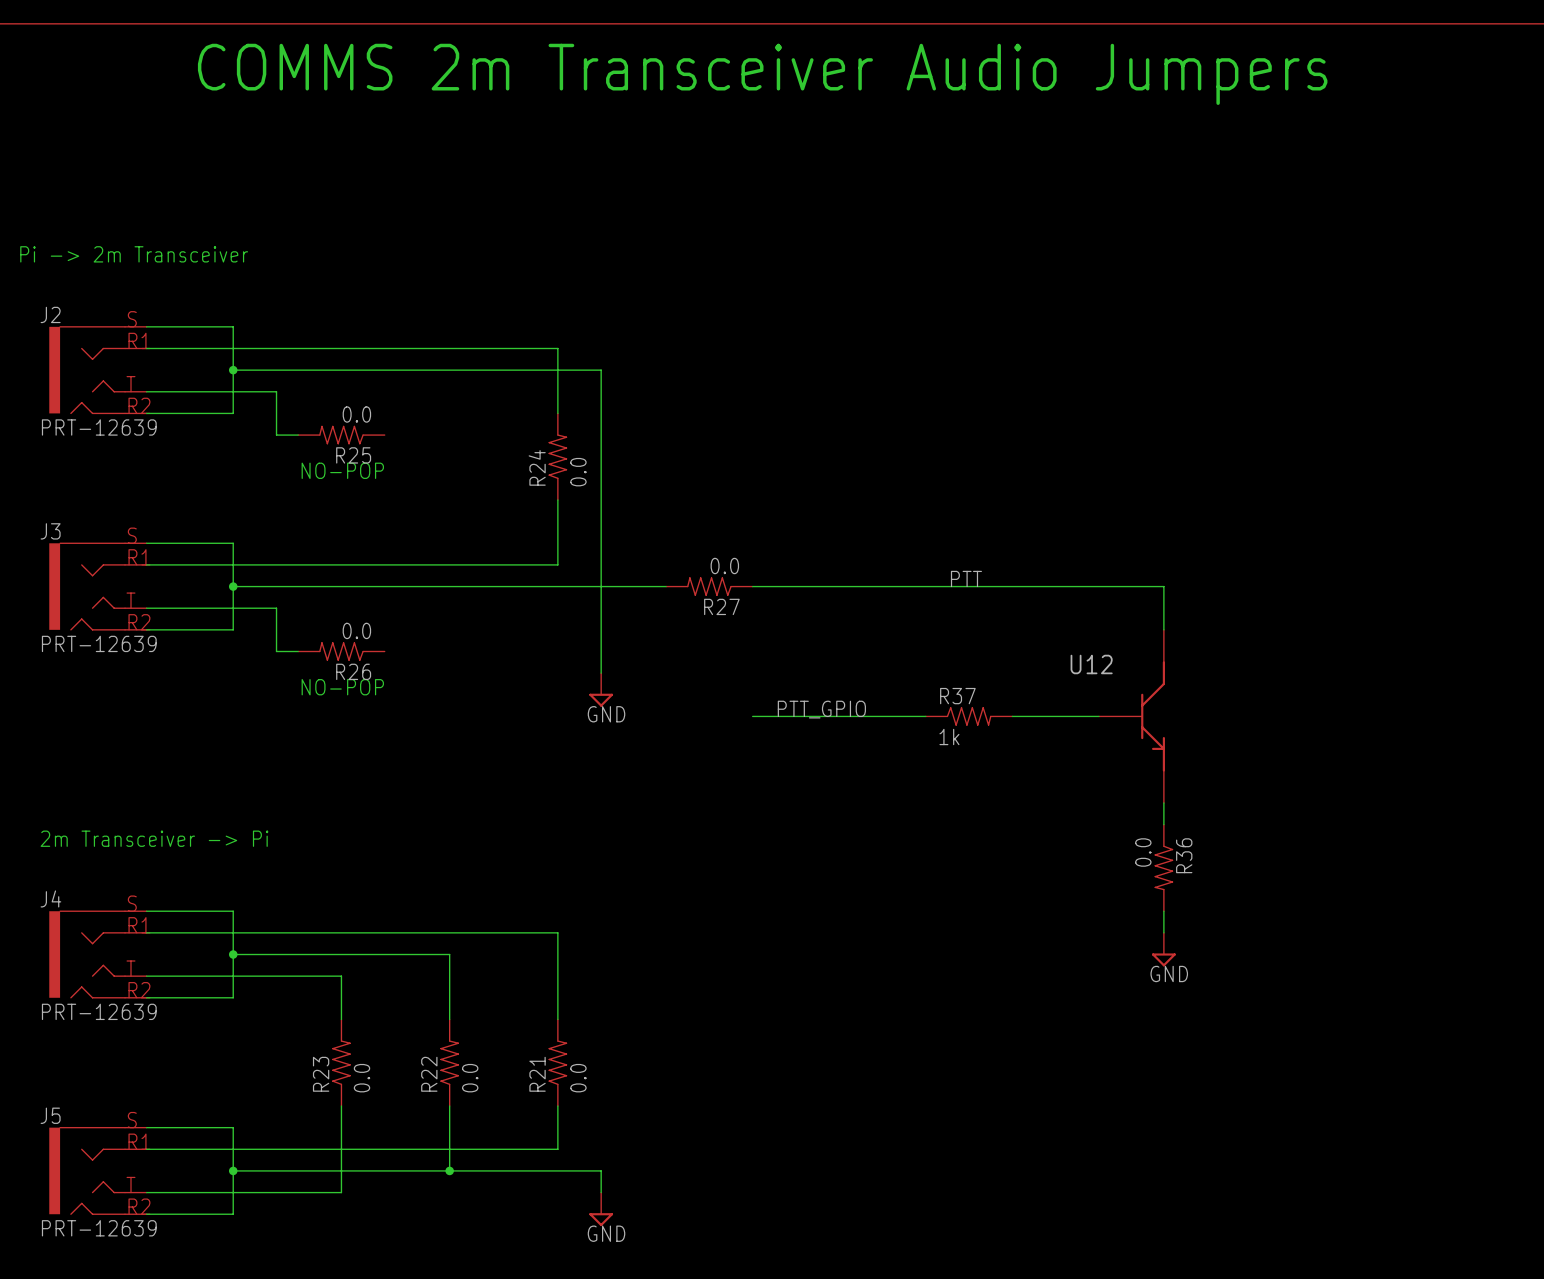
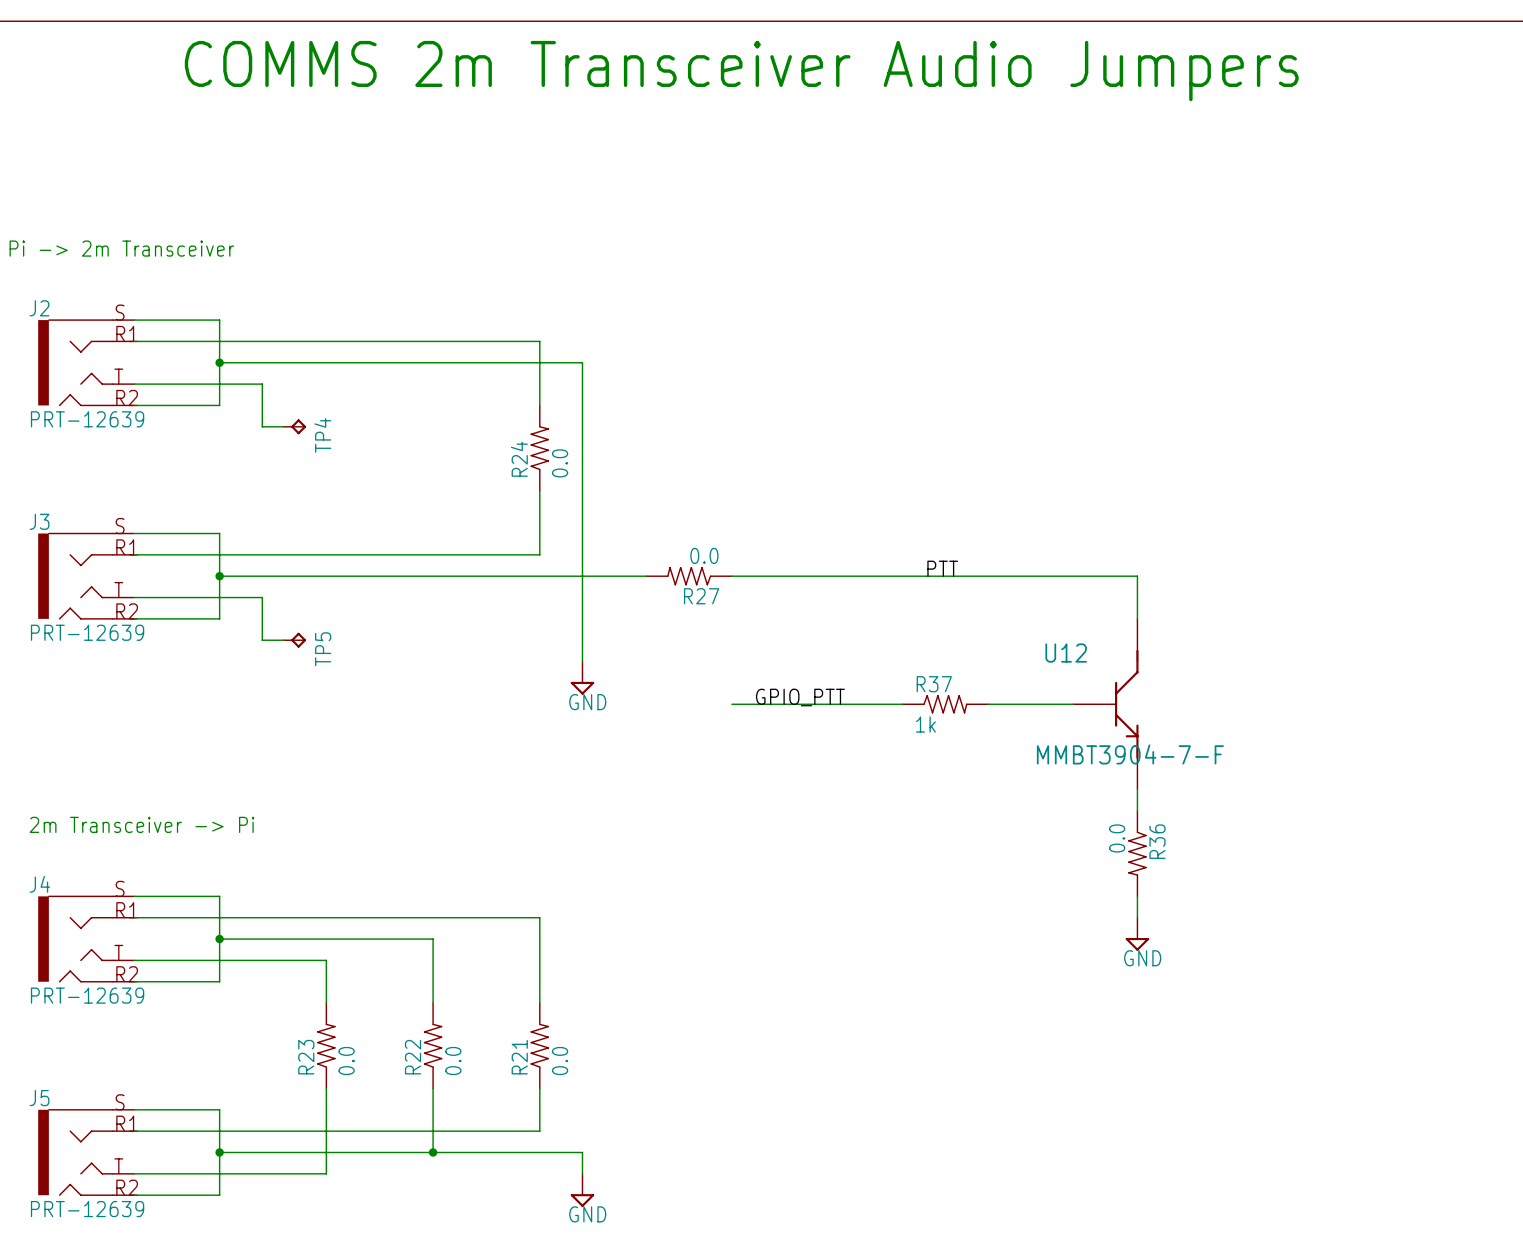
TP4: none -> (294, 426)
R25: 0.0 (341, 435) -> none
text: NO-POP (342, 470) -> none
TP5: none -> (294, 640)
R26: 0.0 (341, 651) -> none
text: NO-POP (342, 687) -> none
label: PTT_GPIO (821, 709) -> GPIO_PTT (800, 697)
U12 value: none -> MMBT3904-7-F (1130, 754)

